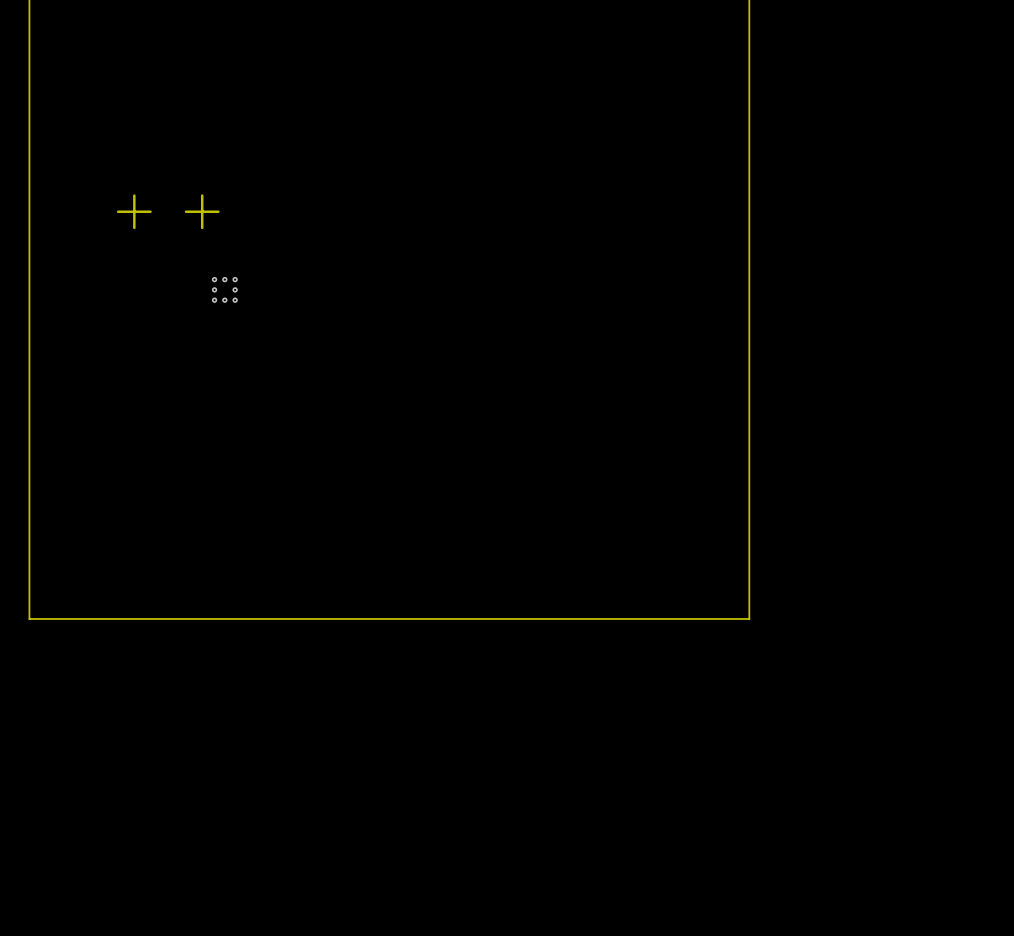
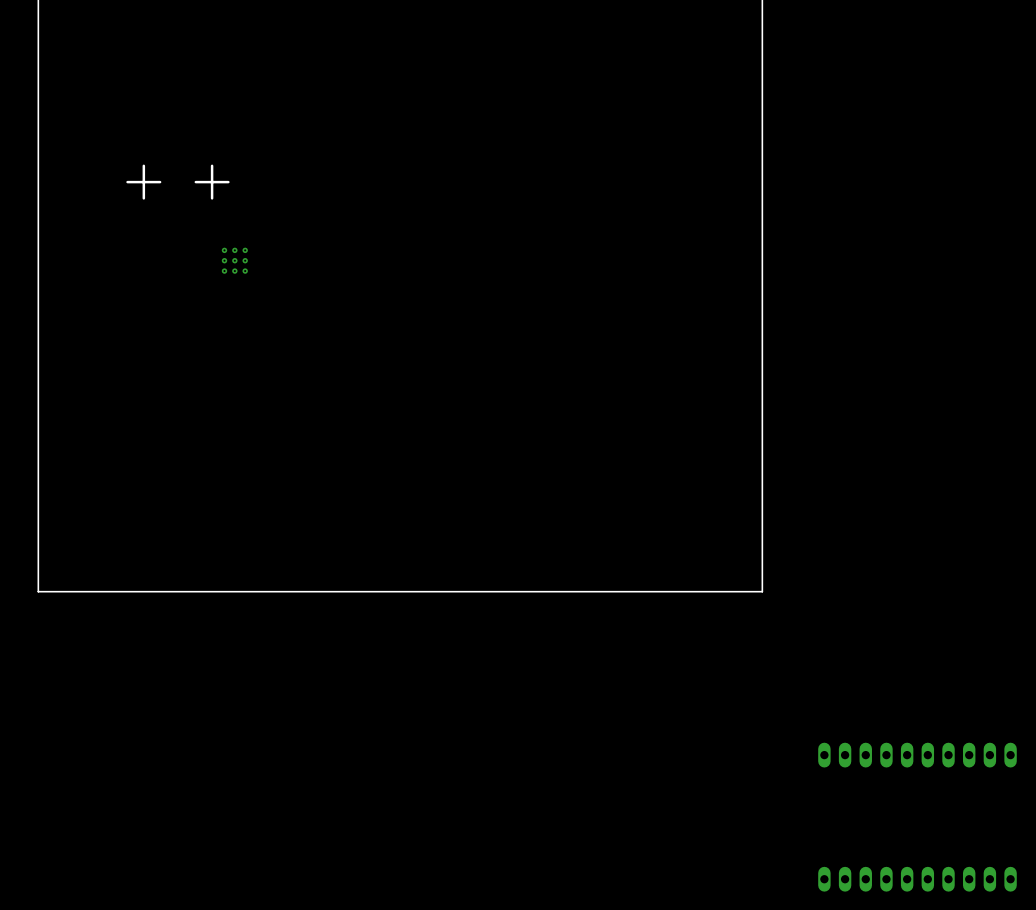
via: none -> (234, 260)
part: none -> (917, 755)
part: none -> (917, 879)

